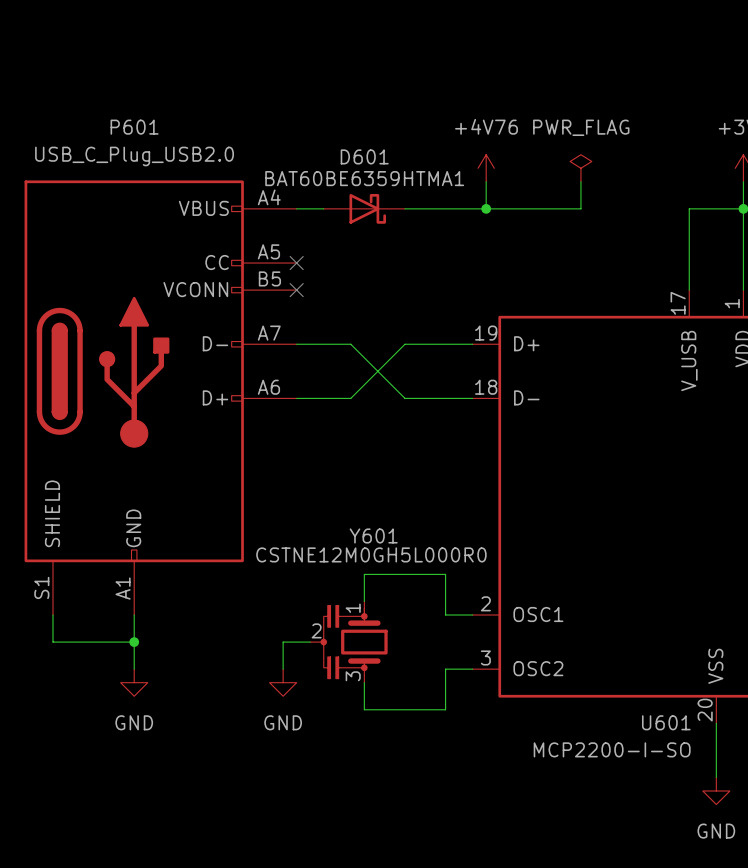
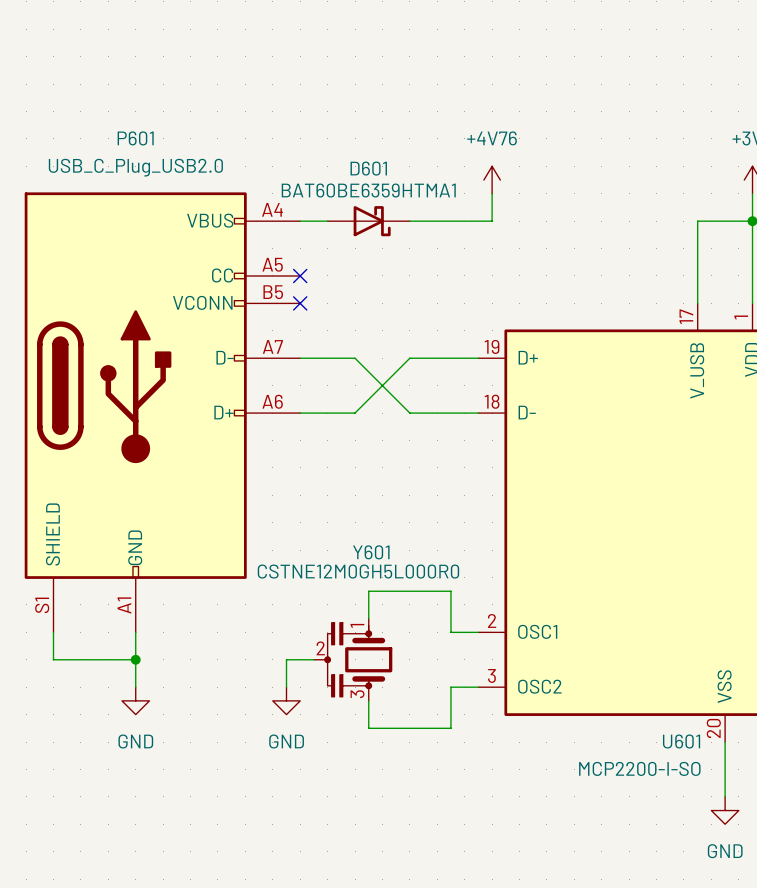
power symbol: PWR_FLAG (580, 168) -> none
wire: (580, 181) (580, 208) (486, 208) -> none
junction: (486, 208) -> none

